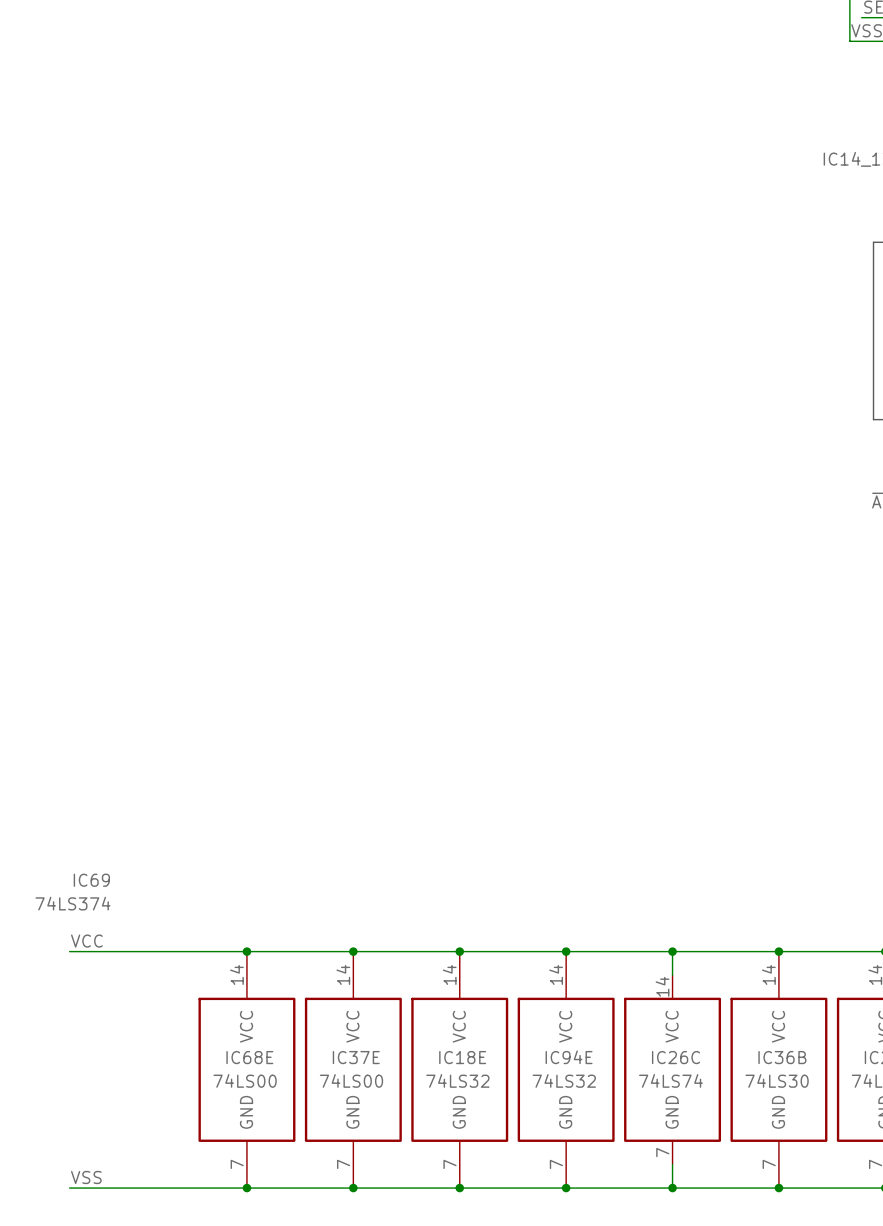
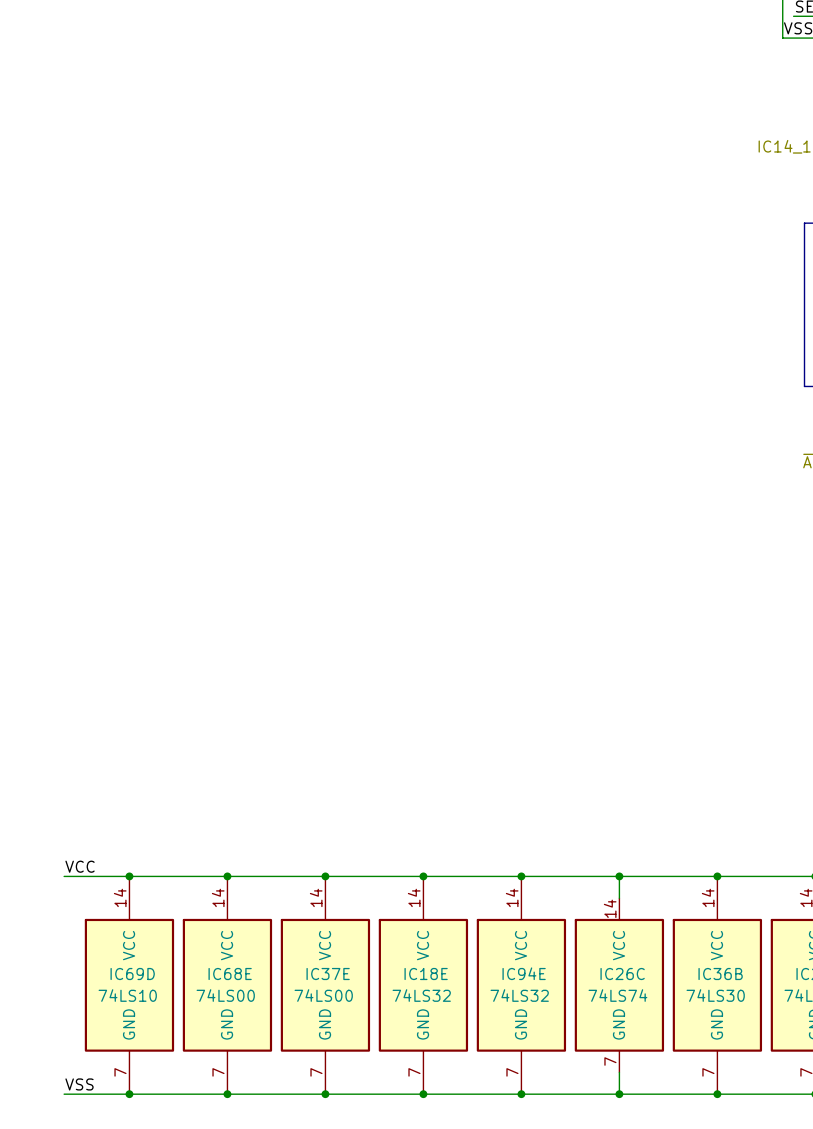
IC69: 74LS374 (72, 892) -> none
junction: none -> (129, 876)
IC69D: none -> 74LS10 (129, 985)
junction: none -> (129, 1094)

